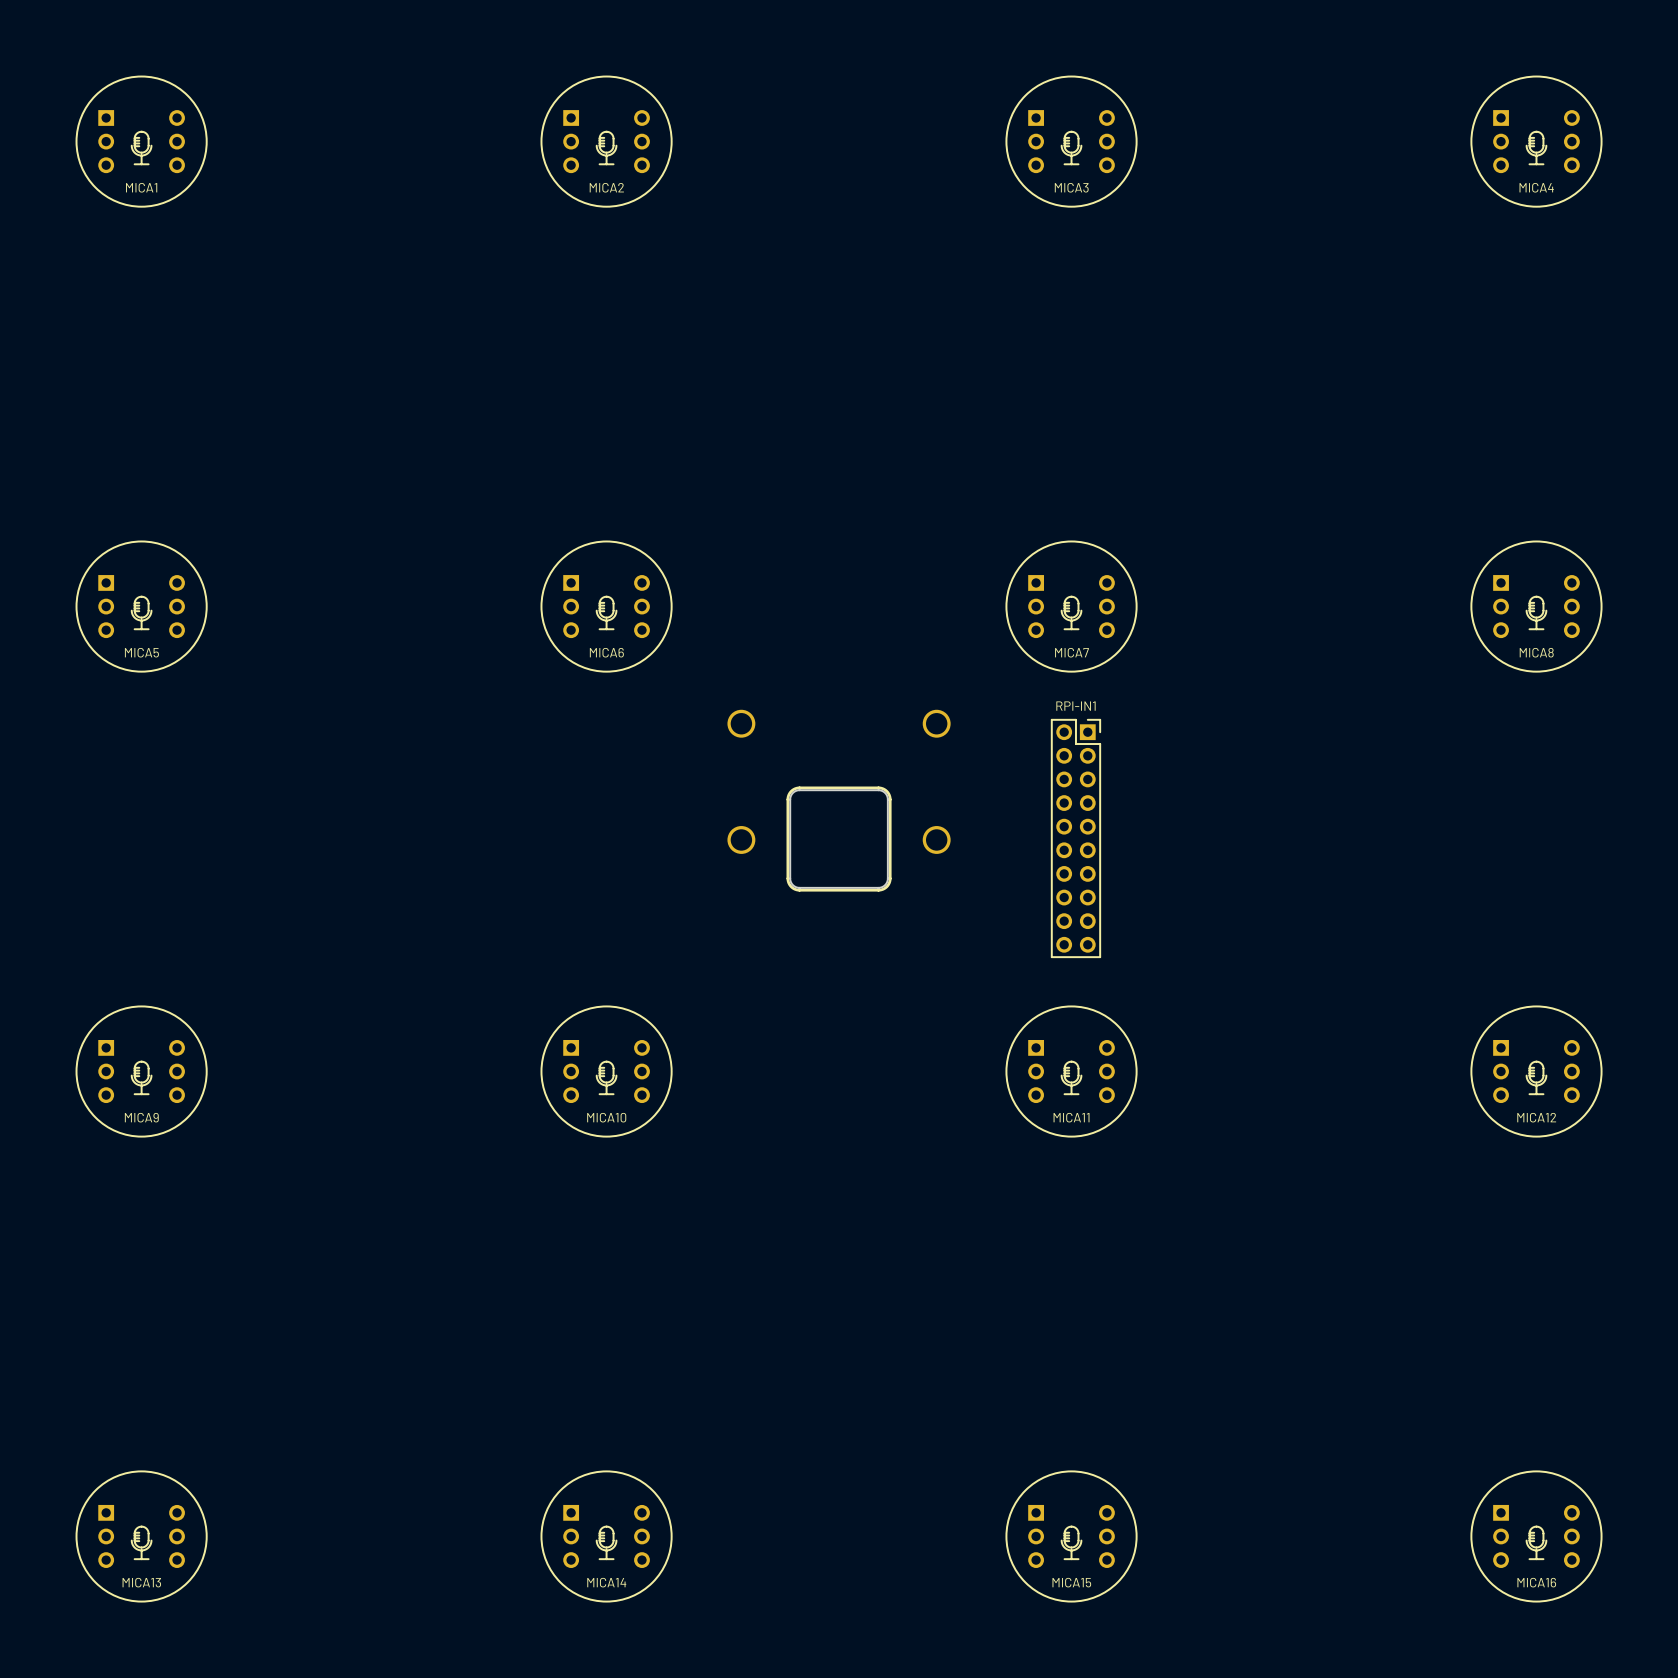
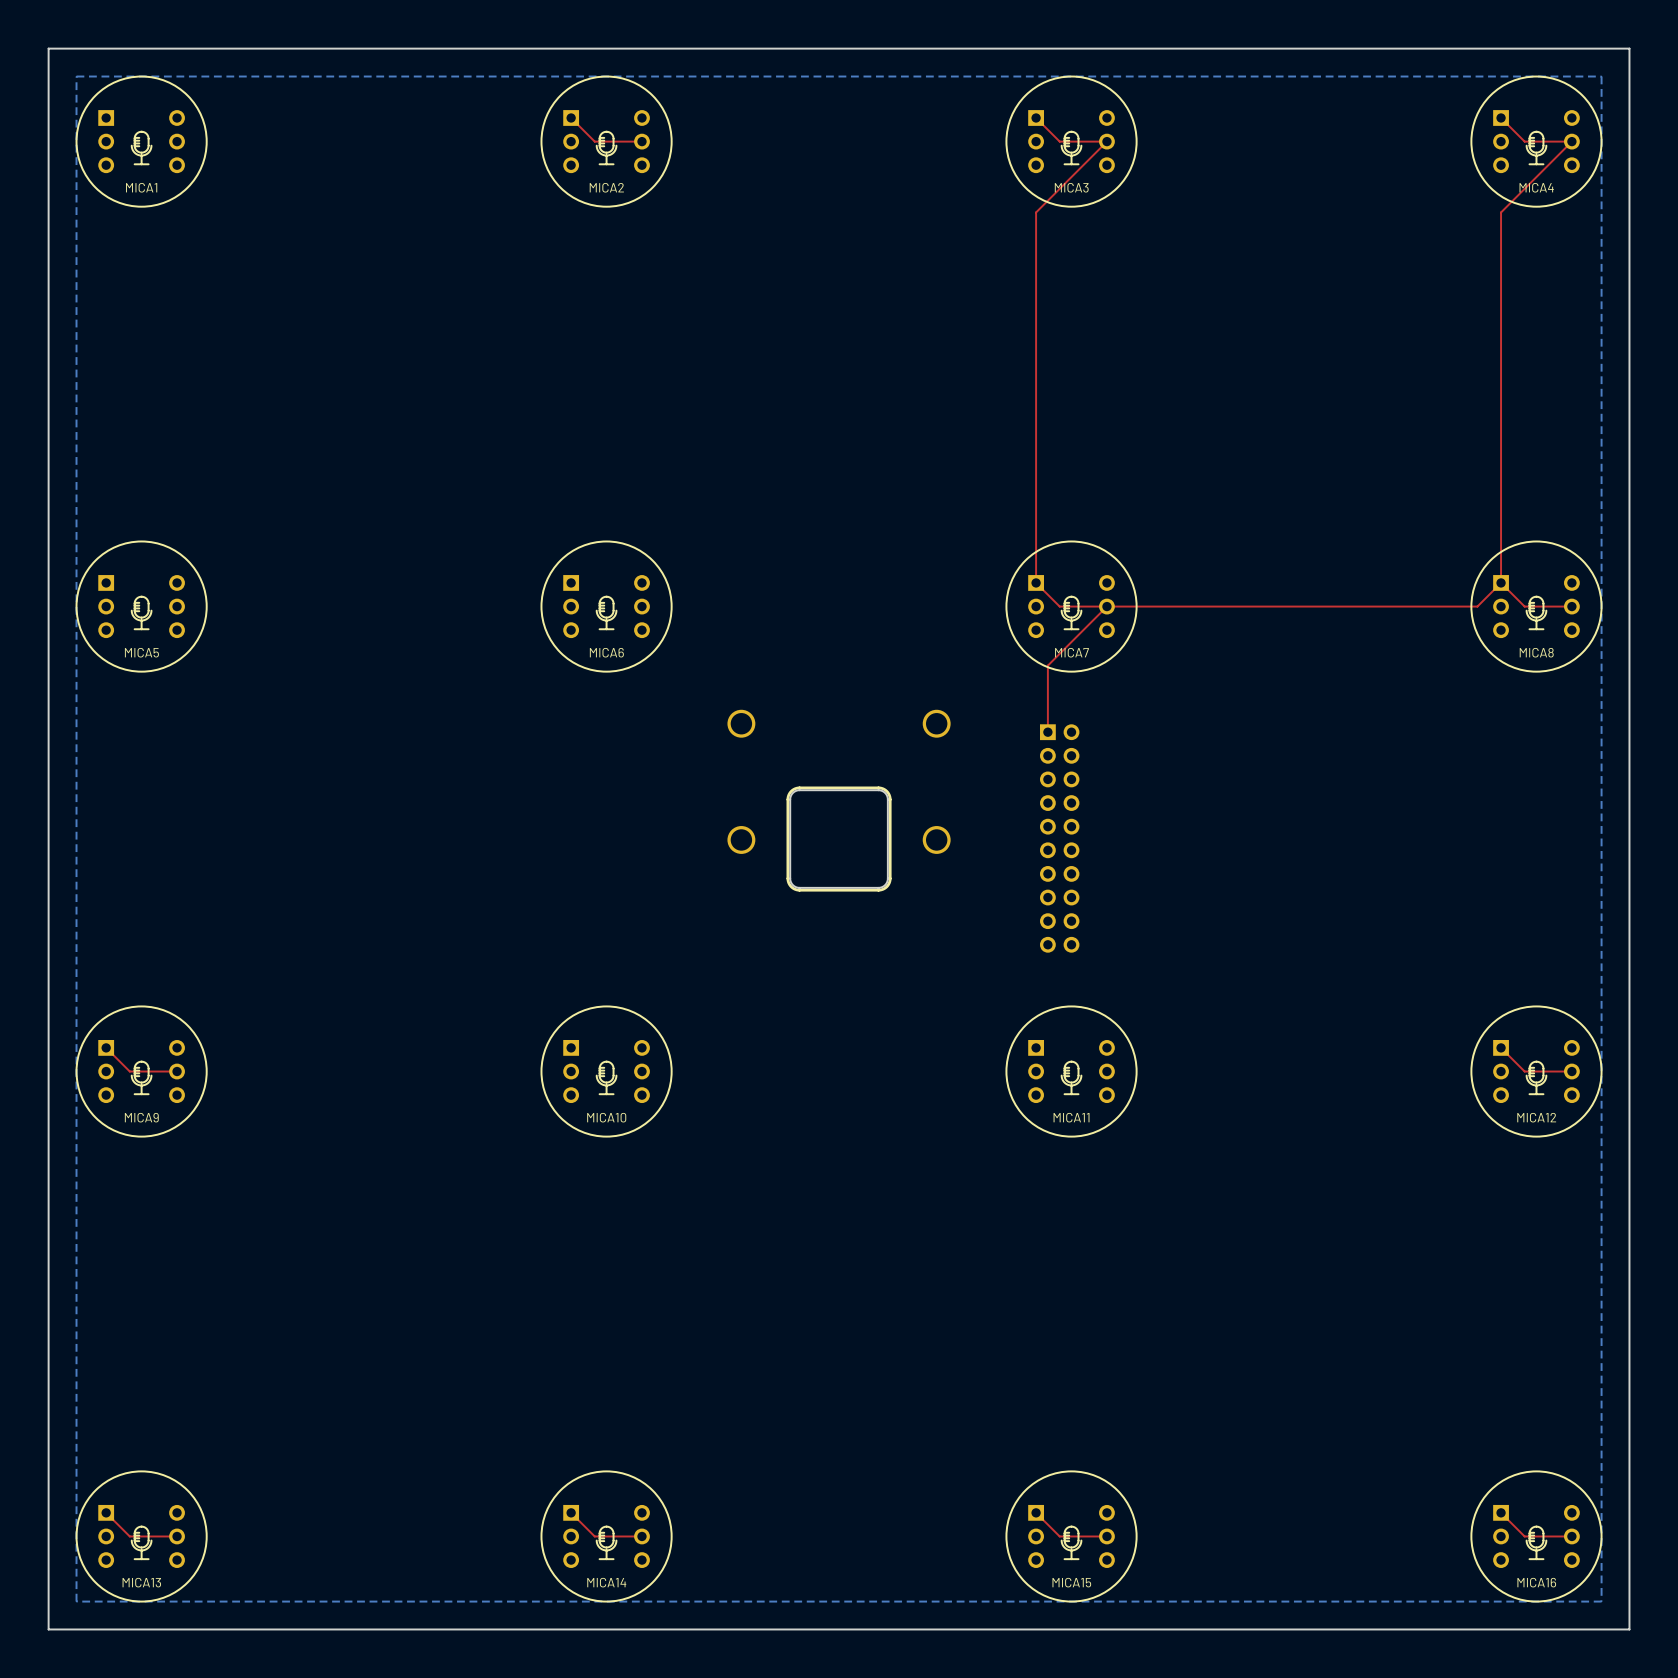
board edge: none -> (48, 48) (1629, 48) (1629, 1629) (48, 1629) (48, 48)
bottom zone outline: none -> (76, 76) (1601, 76) (1601, 1601) (76, 1601) (76, 76)
top track: none -> (571, 117) (594, 141) (641, 141)
top track: none -> (1036, 117) (1059, 141) (1106, 141) (1036, 212) (1036, 582) (1059, 606) (1477, 606) (1501, 582)
top track: none -> (1501, 117) (1524, 141) (1571, 141) (1501, 212) (1501, 582)
top track: none -> (1501, 582) (1524, 606) (1571, 606)
top track: none -> (1106, 606) (1047, 665) (1047, 732)
RPI-IN1 side: top (1075, 838) -> bottom (1059, 838)
top track: none -> (106, 1047) (129, 1071) (177, 1071)
top track: none -> (1501, 1047) (1524, 1071) (1571, 1071)
top track: none -> (106, 1512) (129, 1536) (177, 1536)
top track: none -> (571, 1512) (594, 1536) (641, 1536)
top track: none -> (1036, 1512) (1059, 1536) (1106, 1536)
top track: none -> (1501, 1512) (1524, 1536) (1571, 1536)

